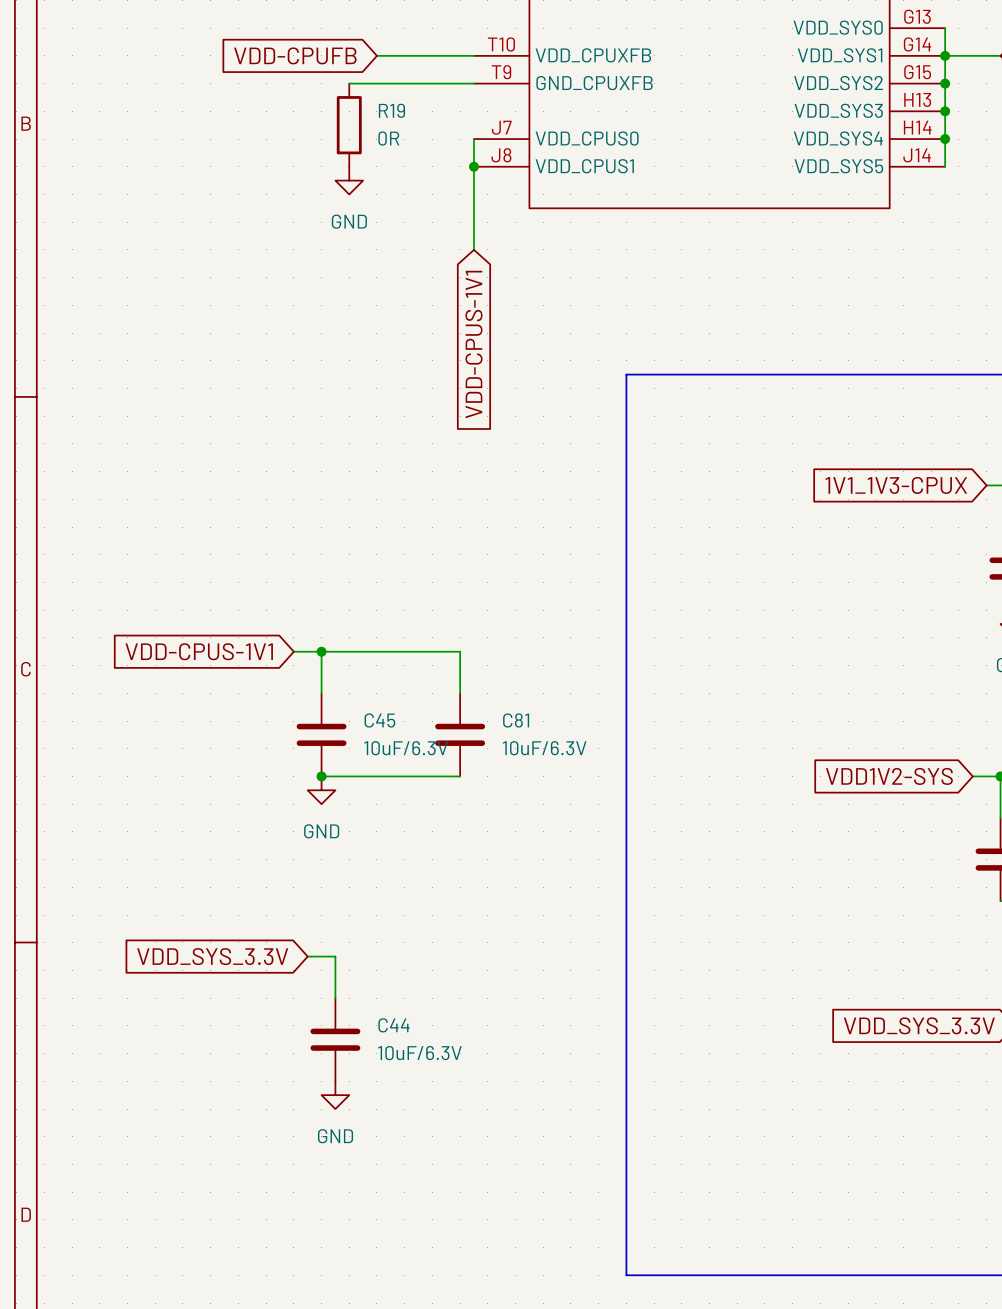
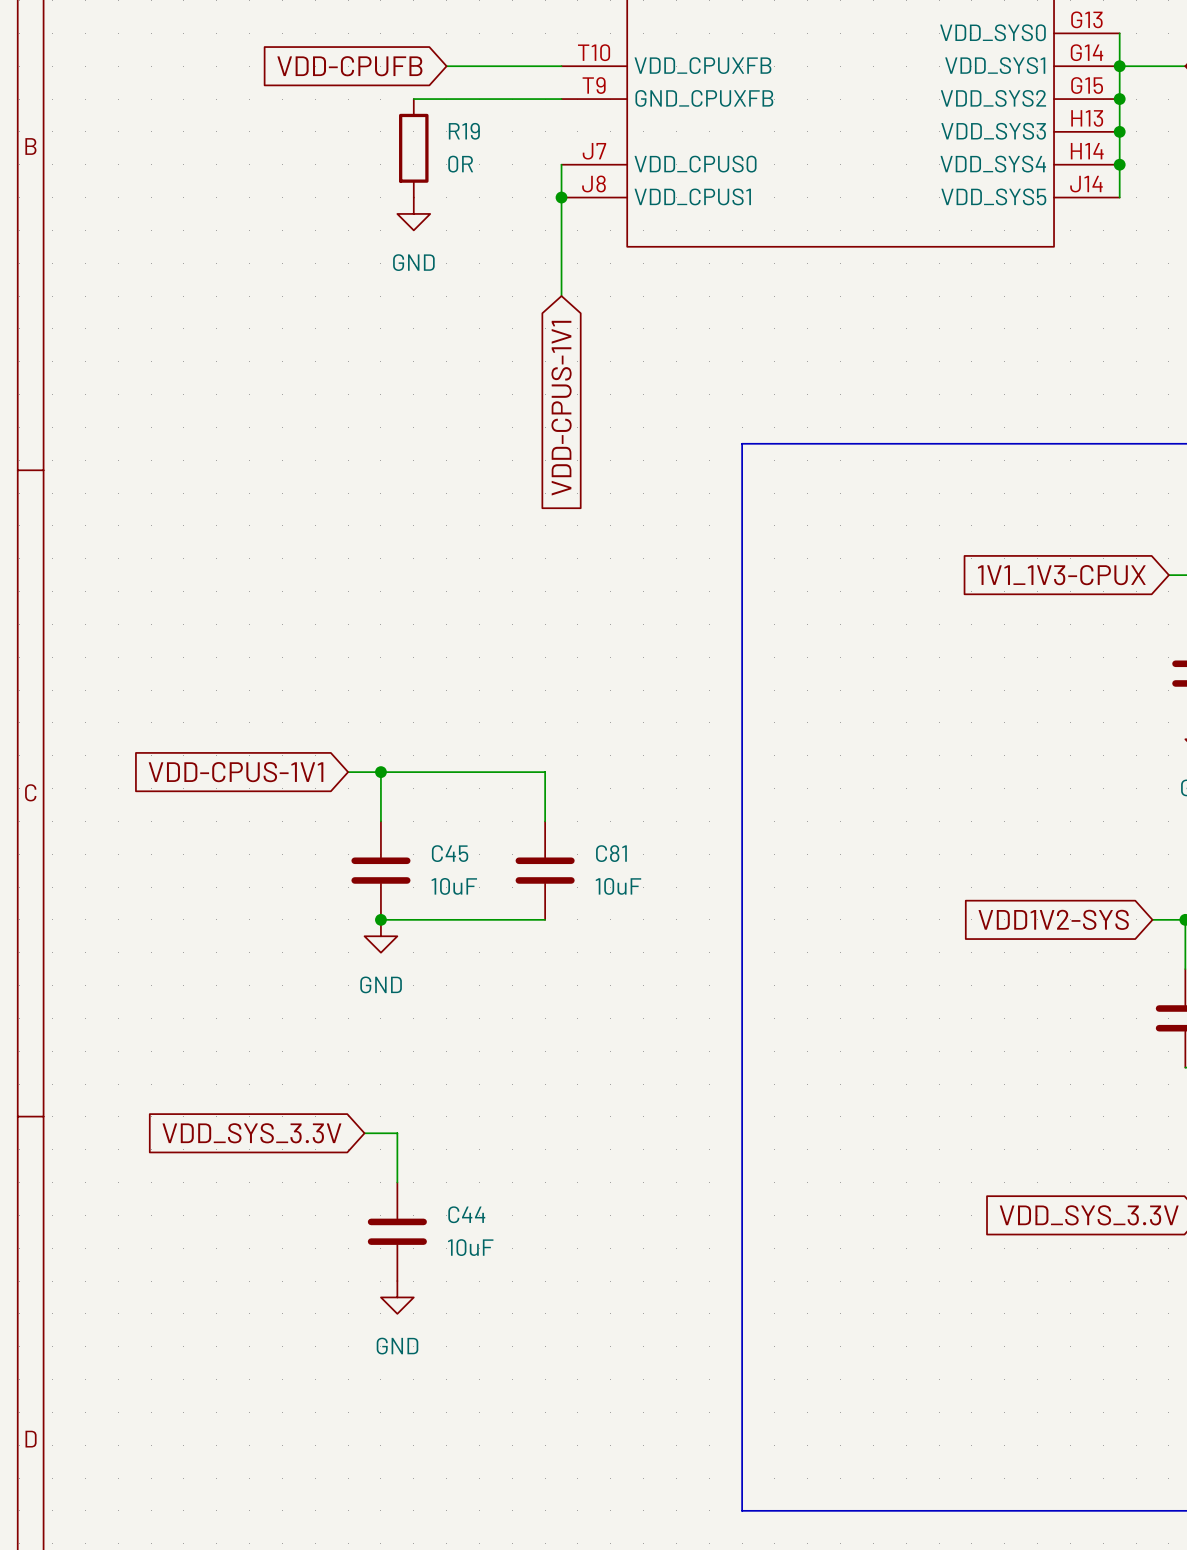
C45 value: 10uF/6.3V (406, 748) -> 10uF (454, 886)
C81 value: 10uF/6.3V (544, 748) -> 10uF (618, 886)
C44 value: 10uF/6.3V (419, 1053) -> 10uF (470, 1247)

